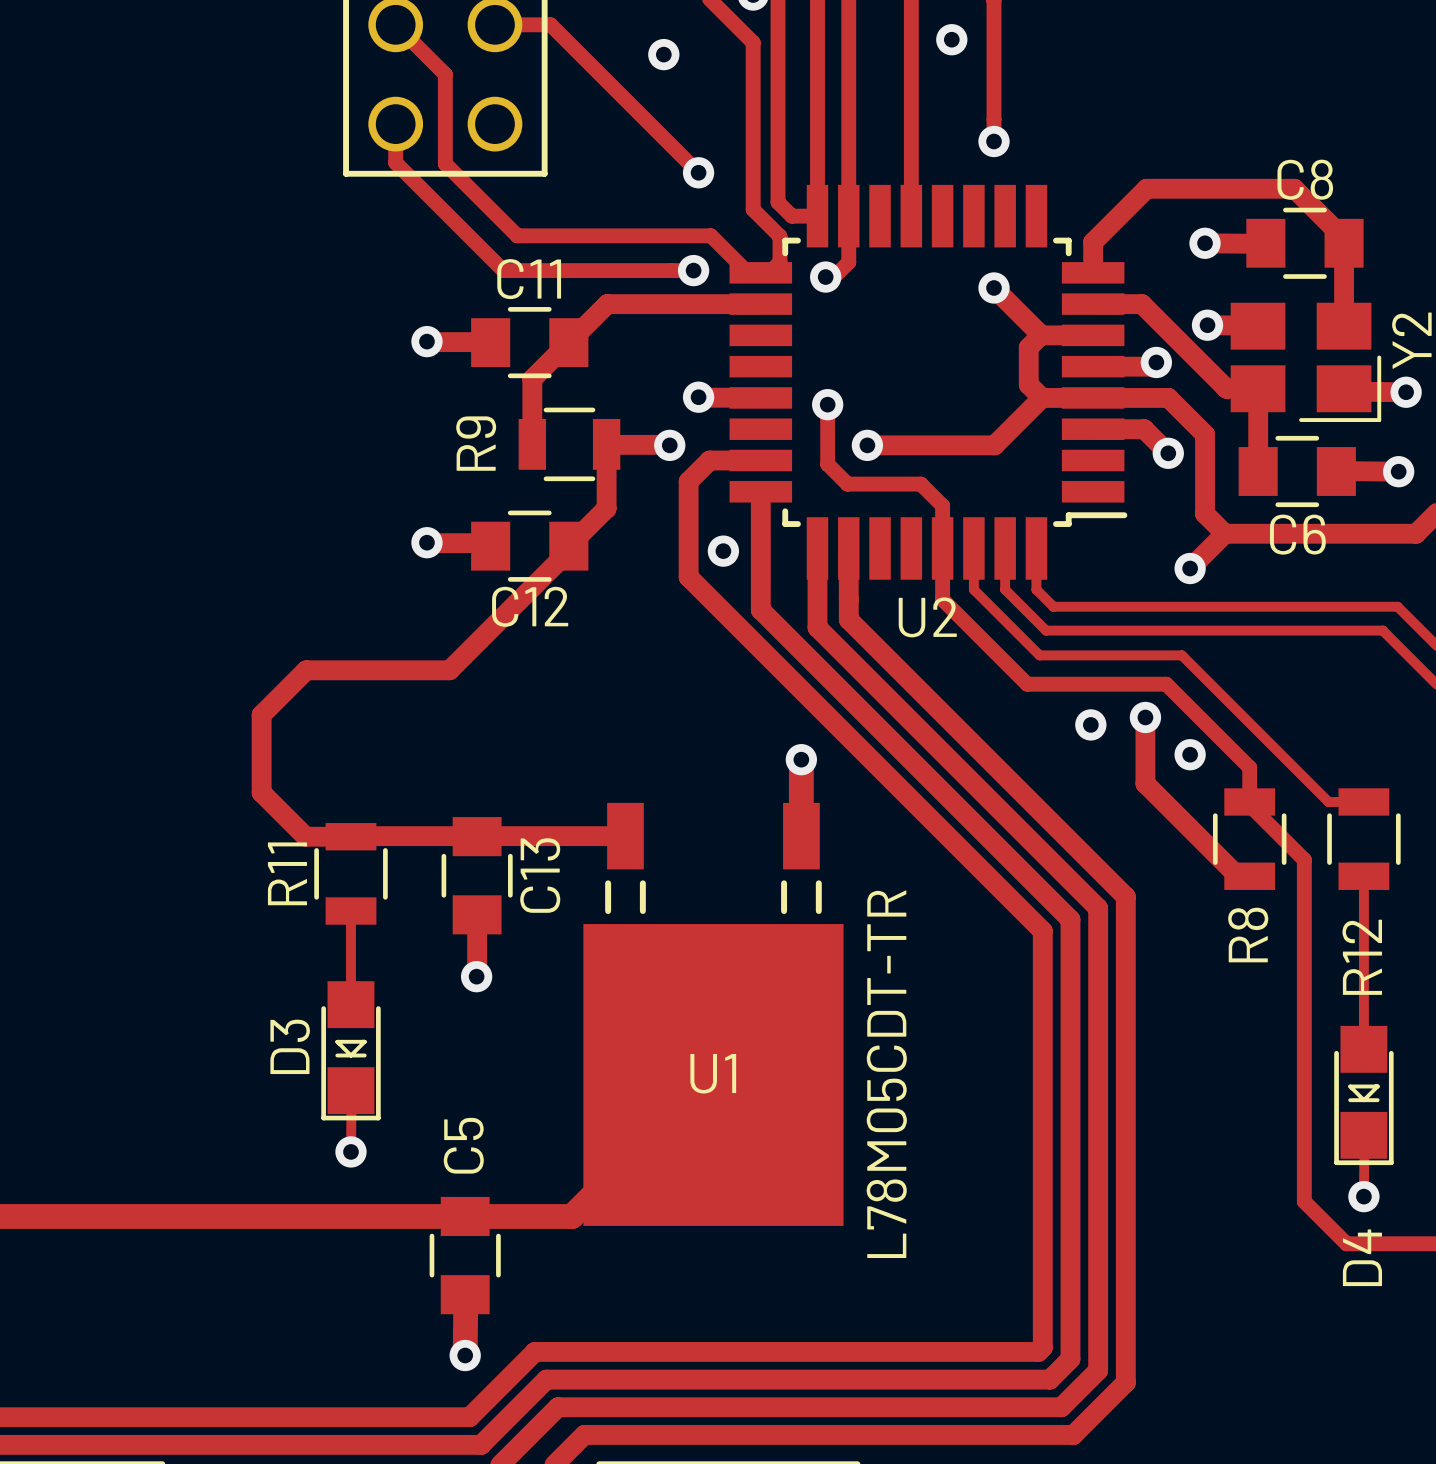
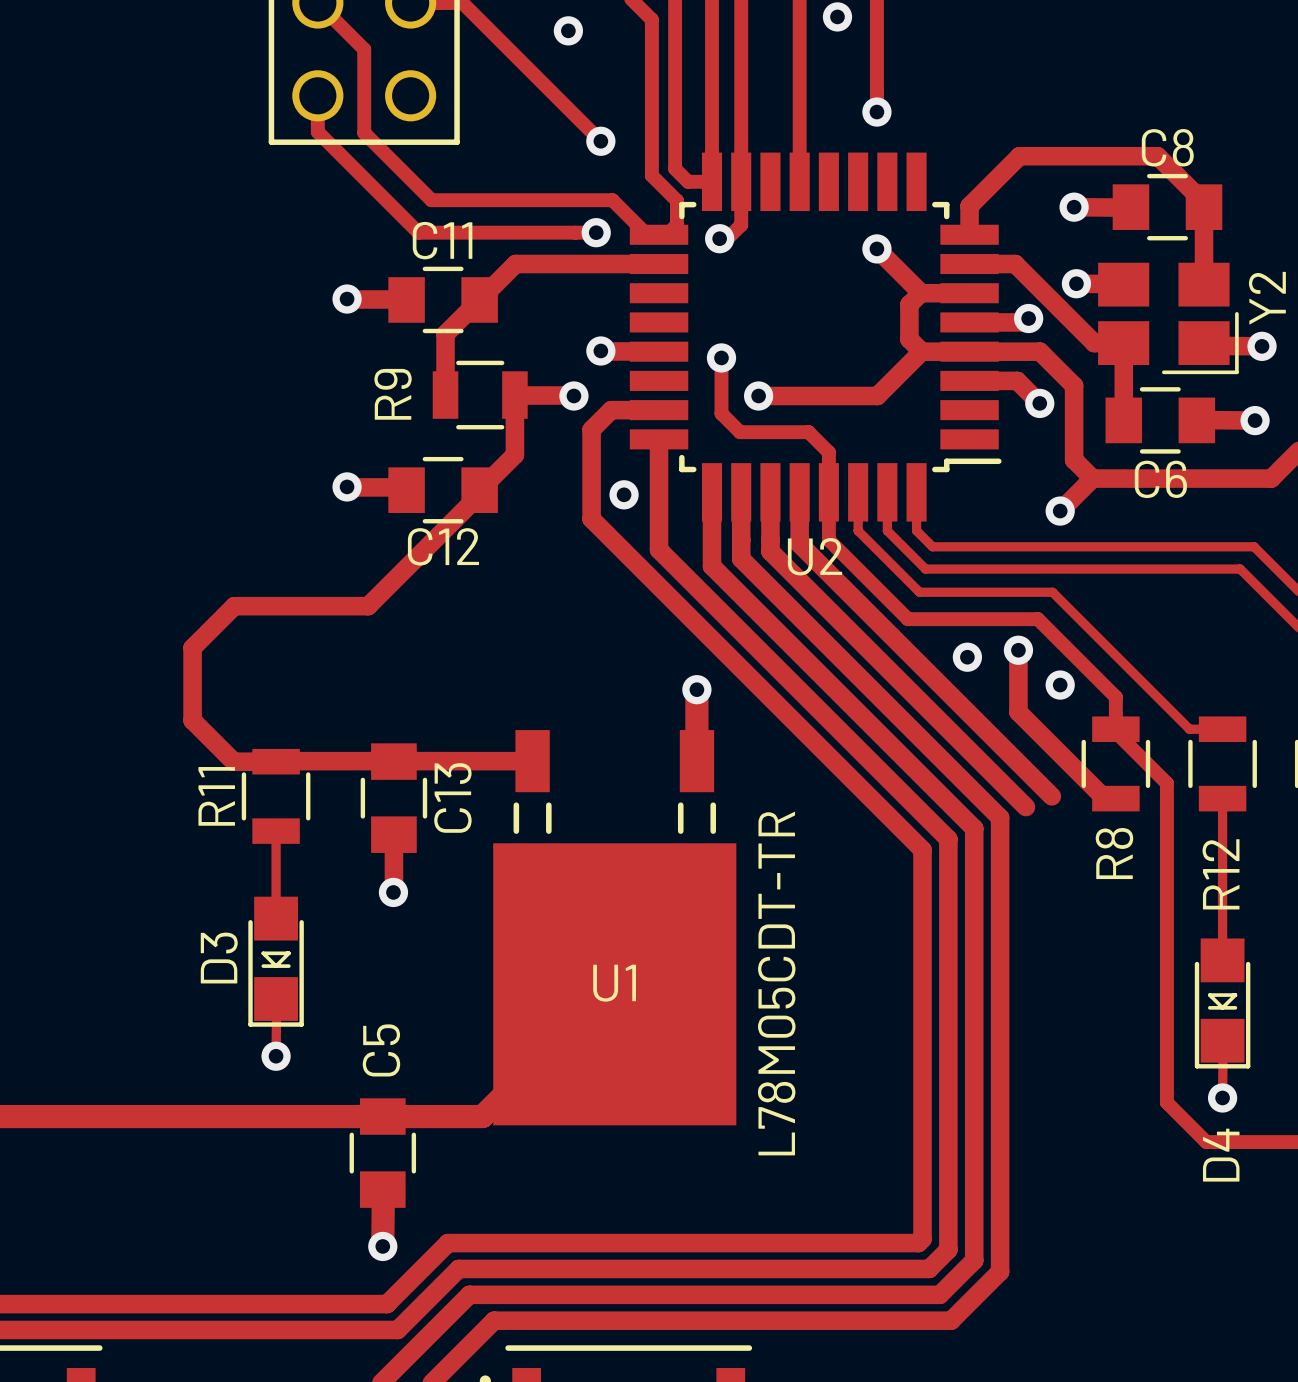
track: none -> (770, 492) (770, 551) (1025, 807)
track: none -> (799, 492) (799, 544) (1051, 796)

